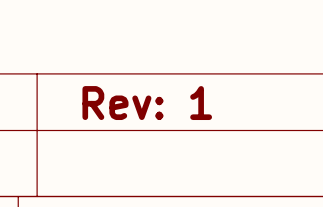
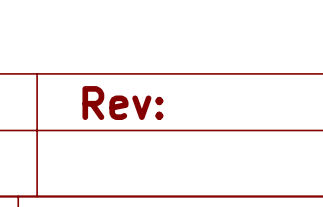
title block: Rev: 1 (147, 103) -> Rev: (122, 103)

